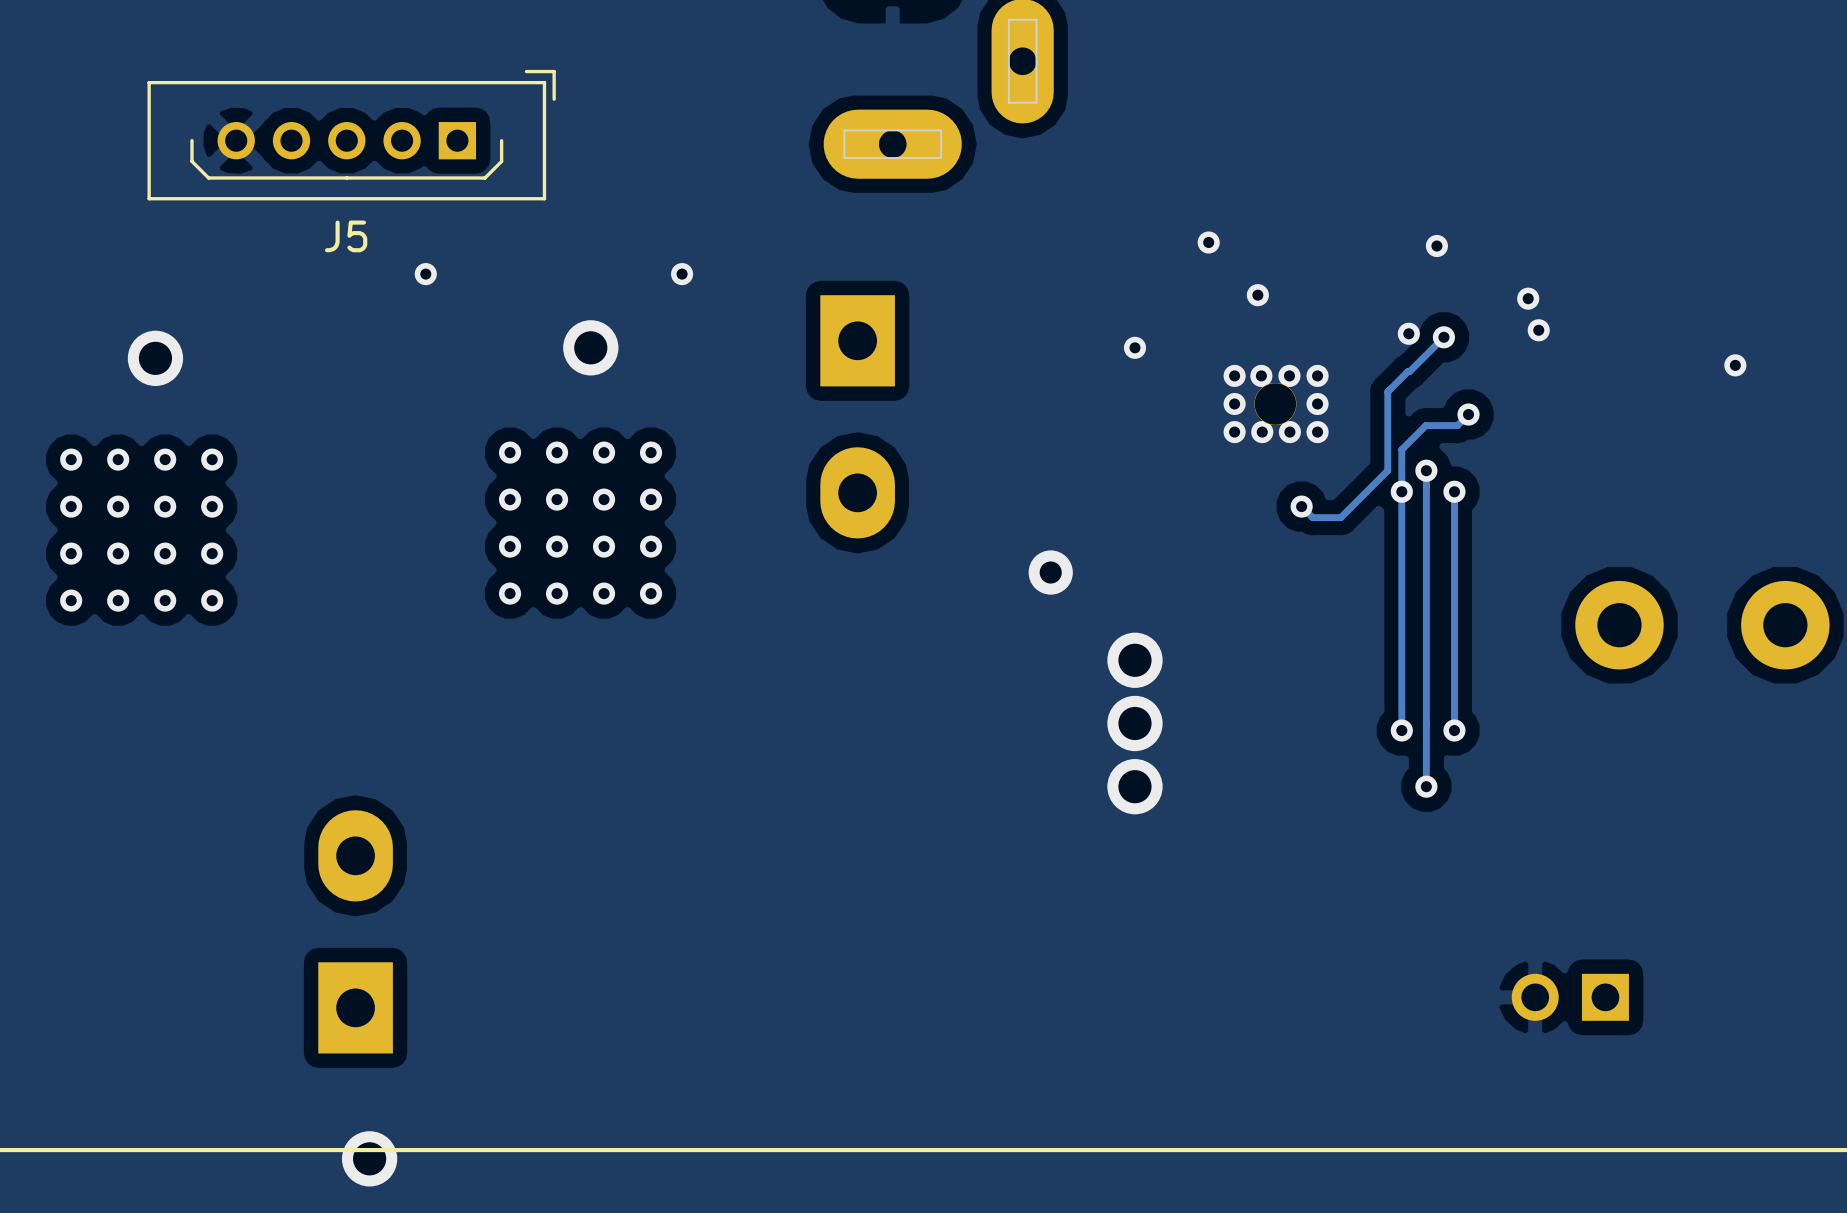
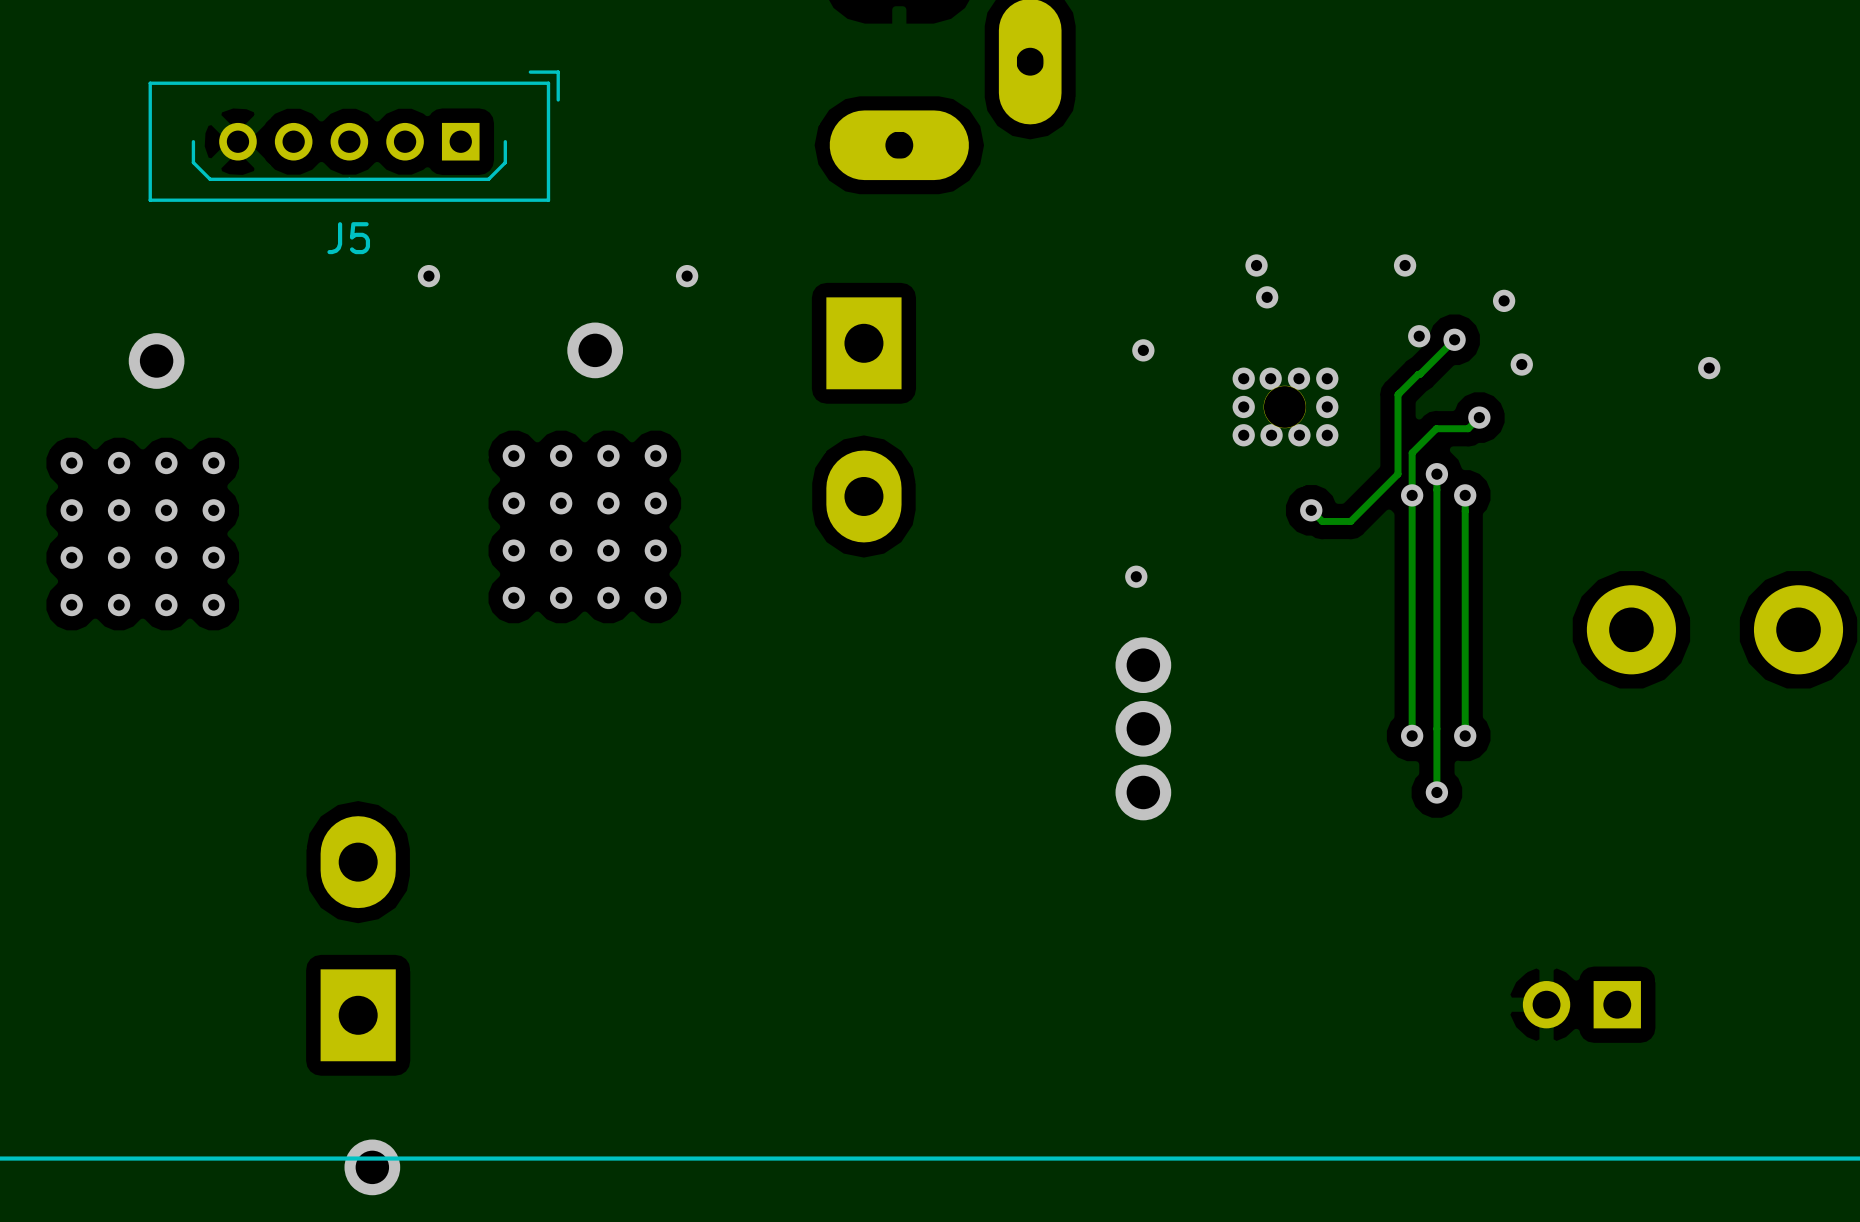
via position: (1208, 242) -> (1256, 265)
via: (1436, 246) -> none
via: none -> (1405, 265)
via: none -> (1504, 300)
via: (1528, 298) -> none
via: (1538, 330) -> none
via: none -> (1521, 364)
via position: (1735, 365) -> (1709, 368)
via: (1050, 572) -> none
via: none -> (1136, 576)

